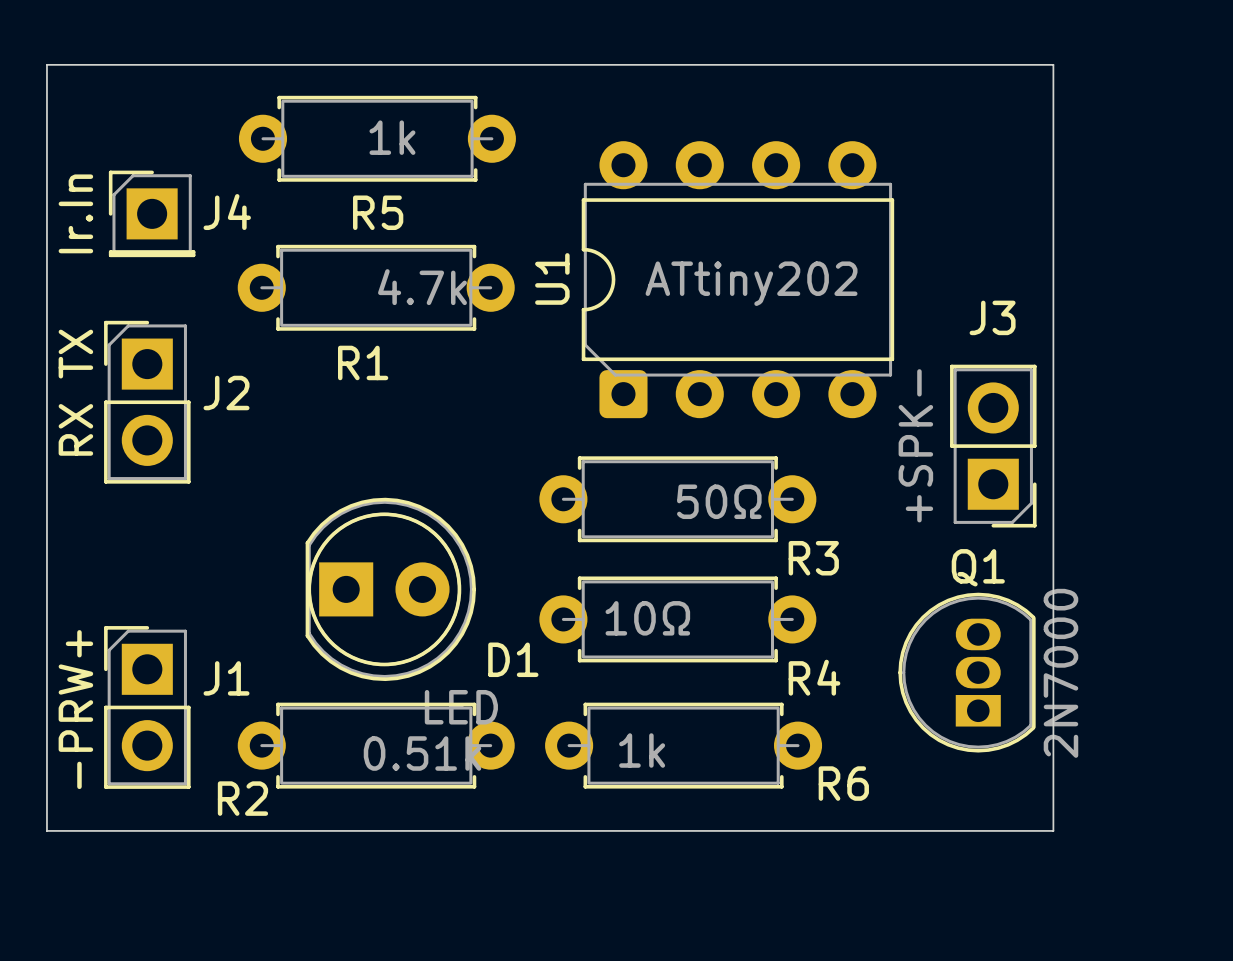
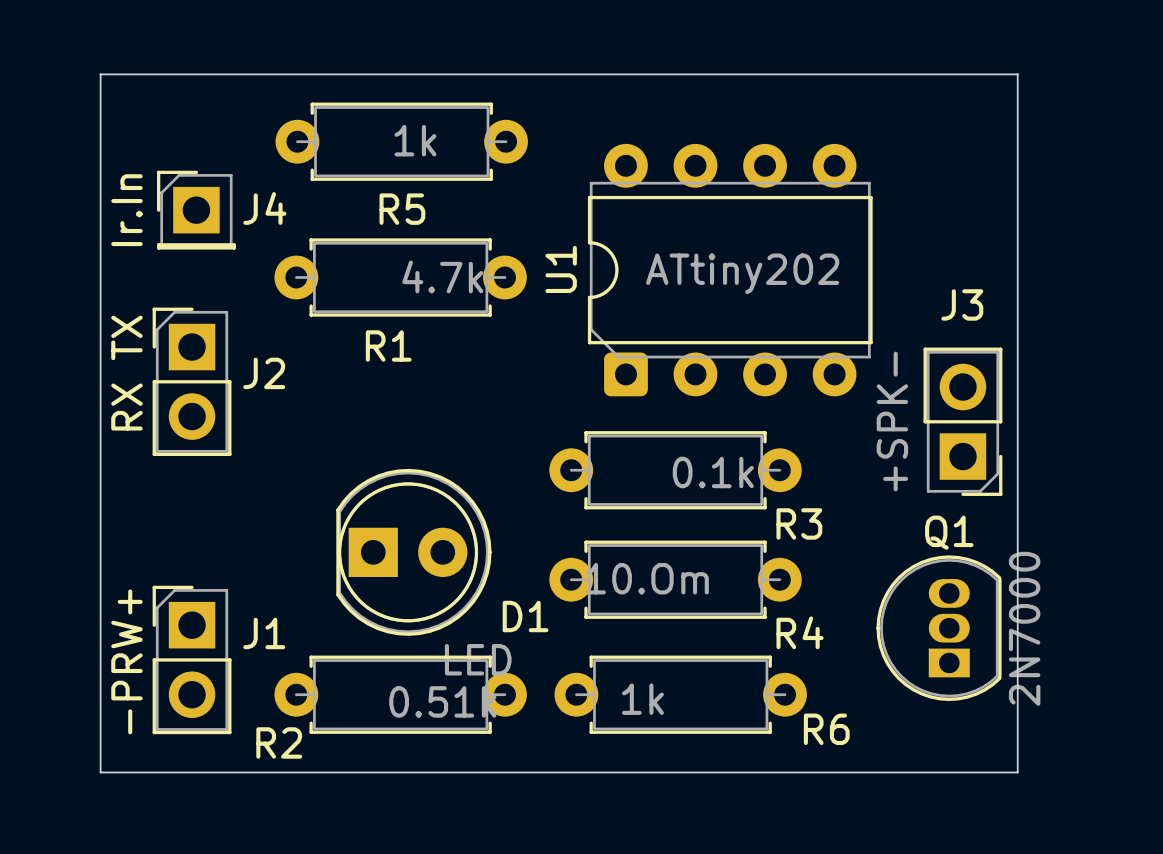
R3 value: 50Ω (719, 501) -> 0.1k (713, 472)
R4 value: 10Ω (647, 618) -> 10.Om (647, 578)

